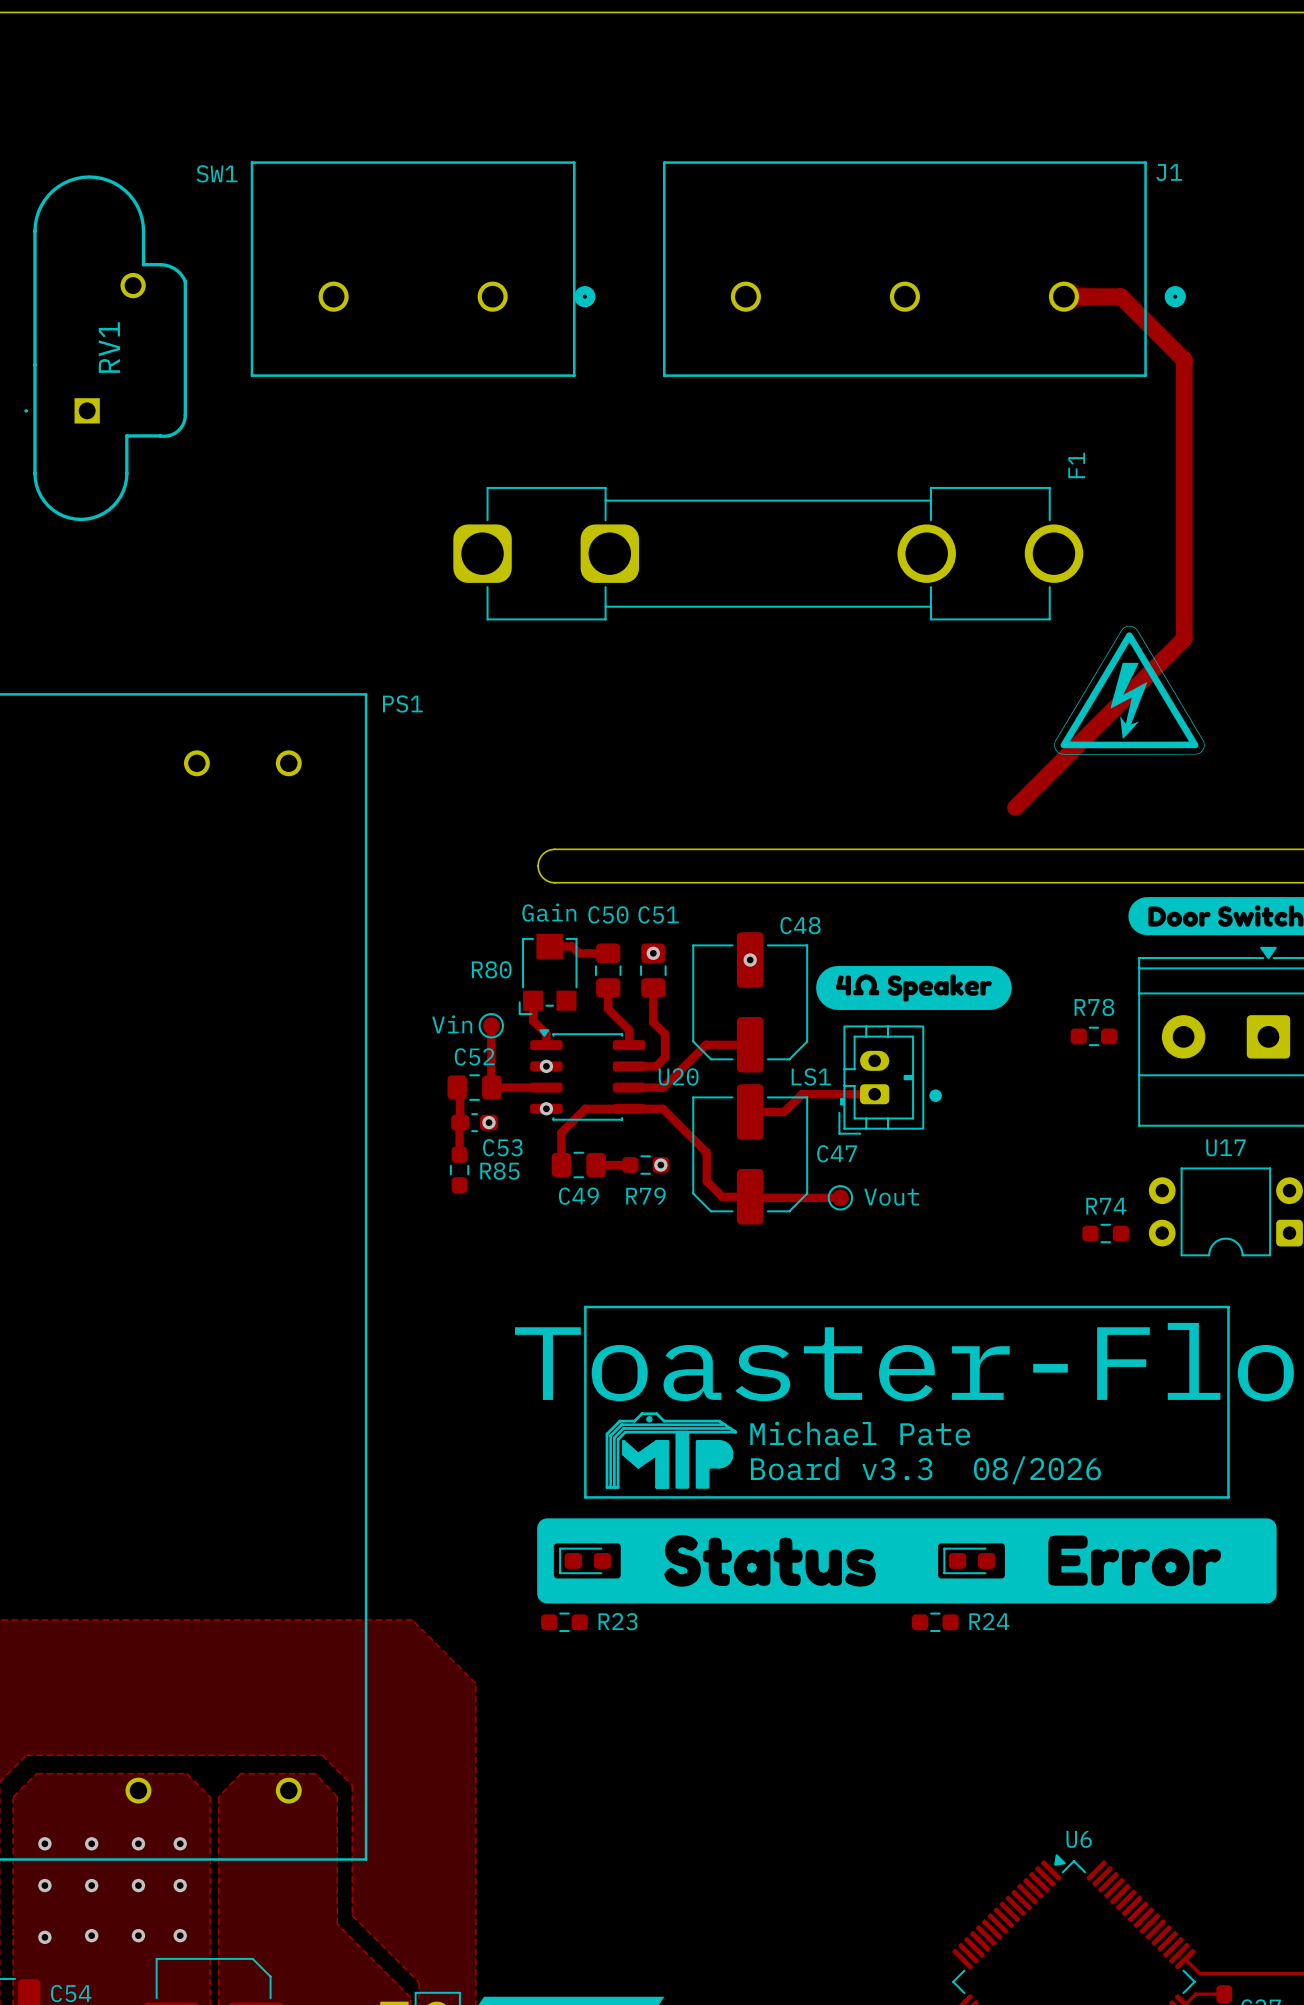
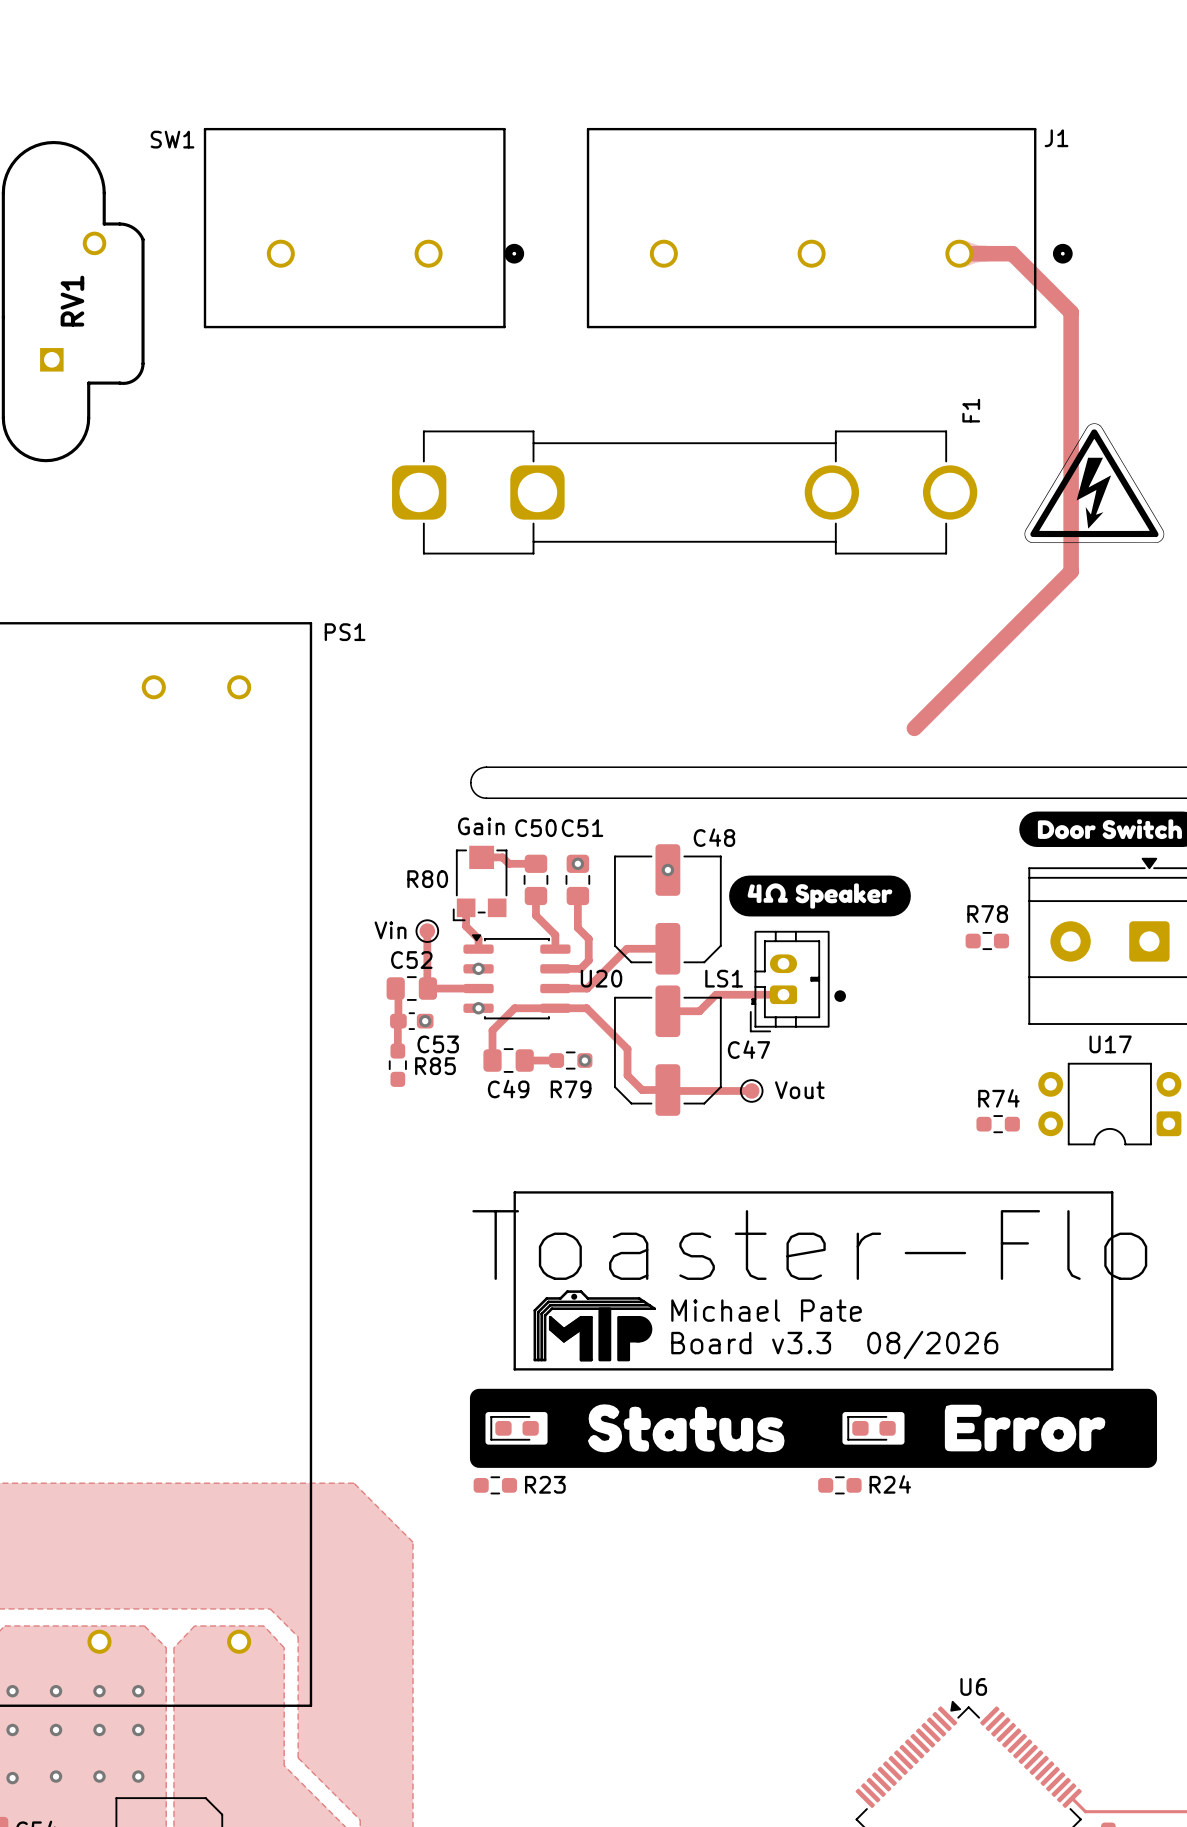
drawing position: (1129, 690) -> (1094, 483)

